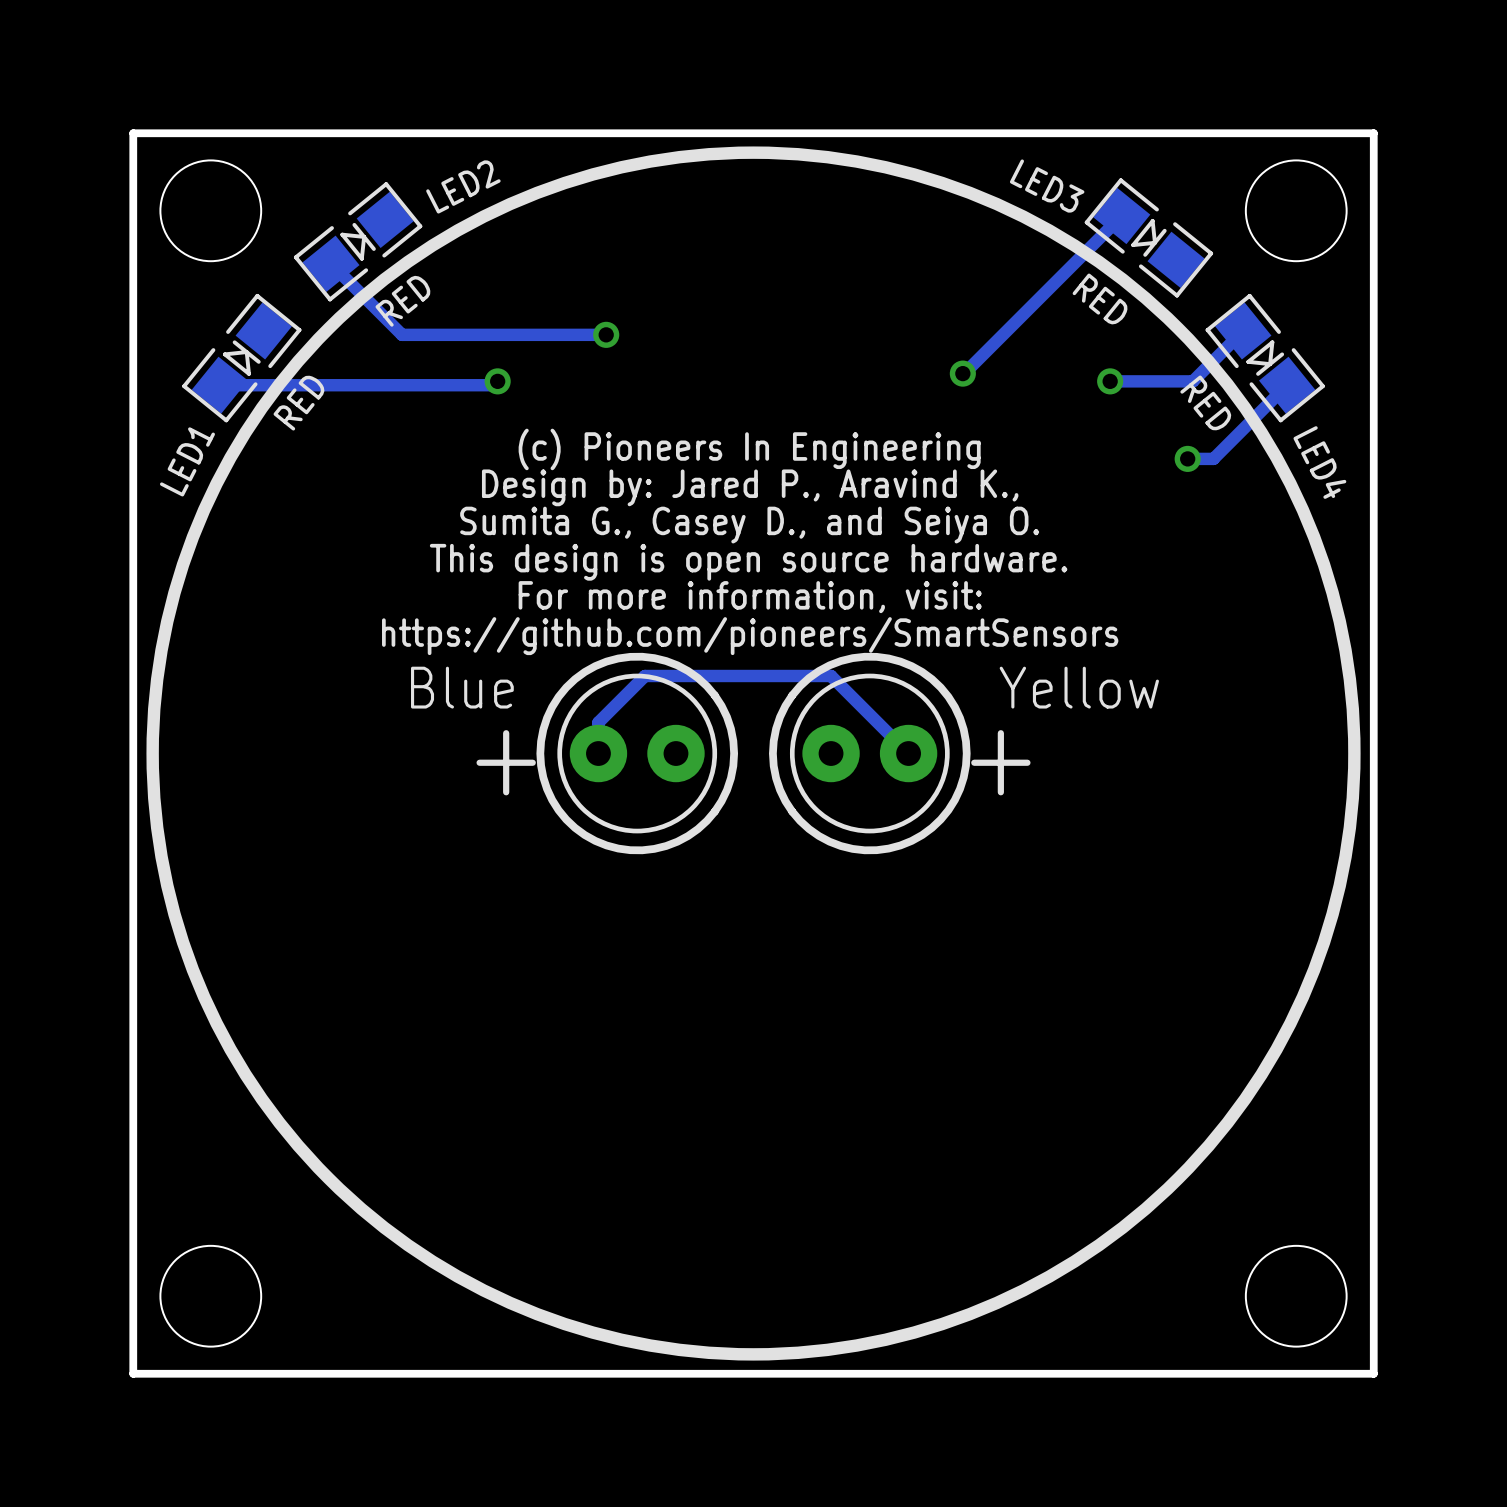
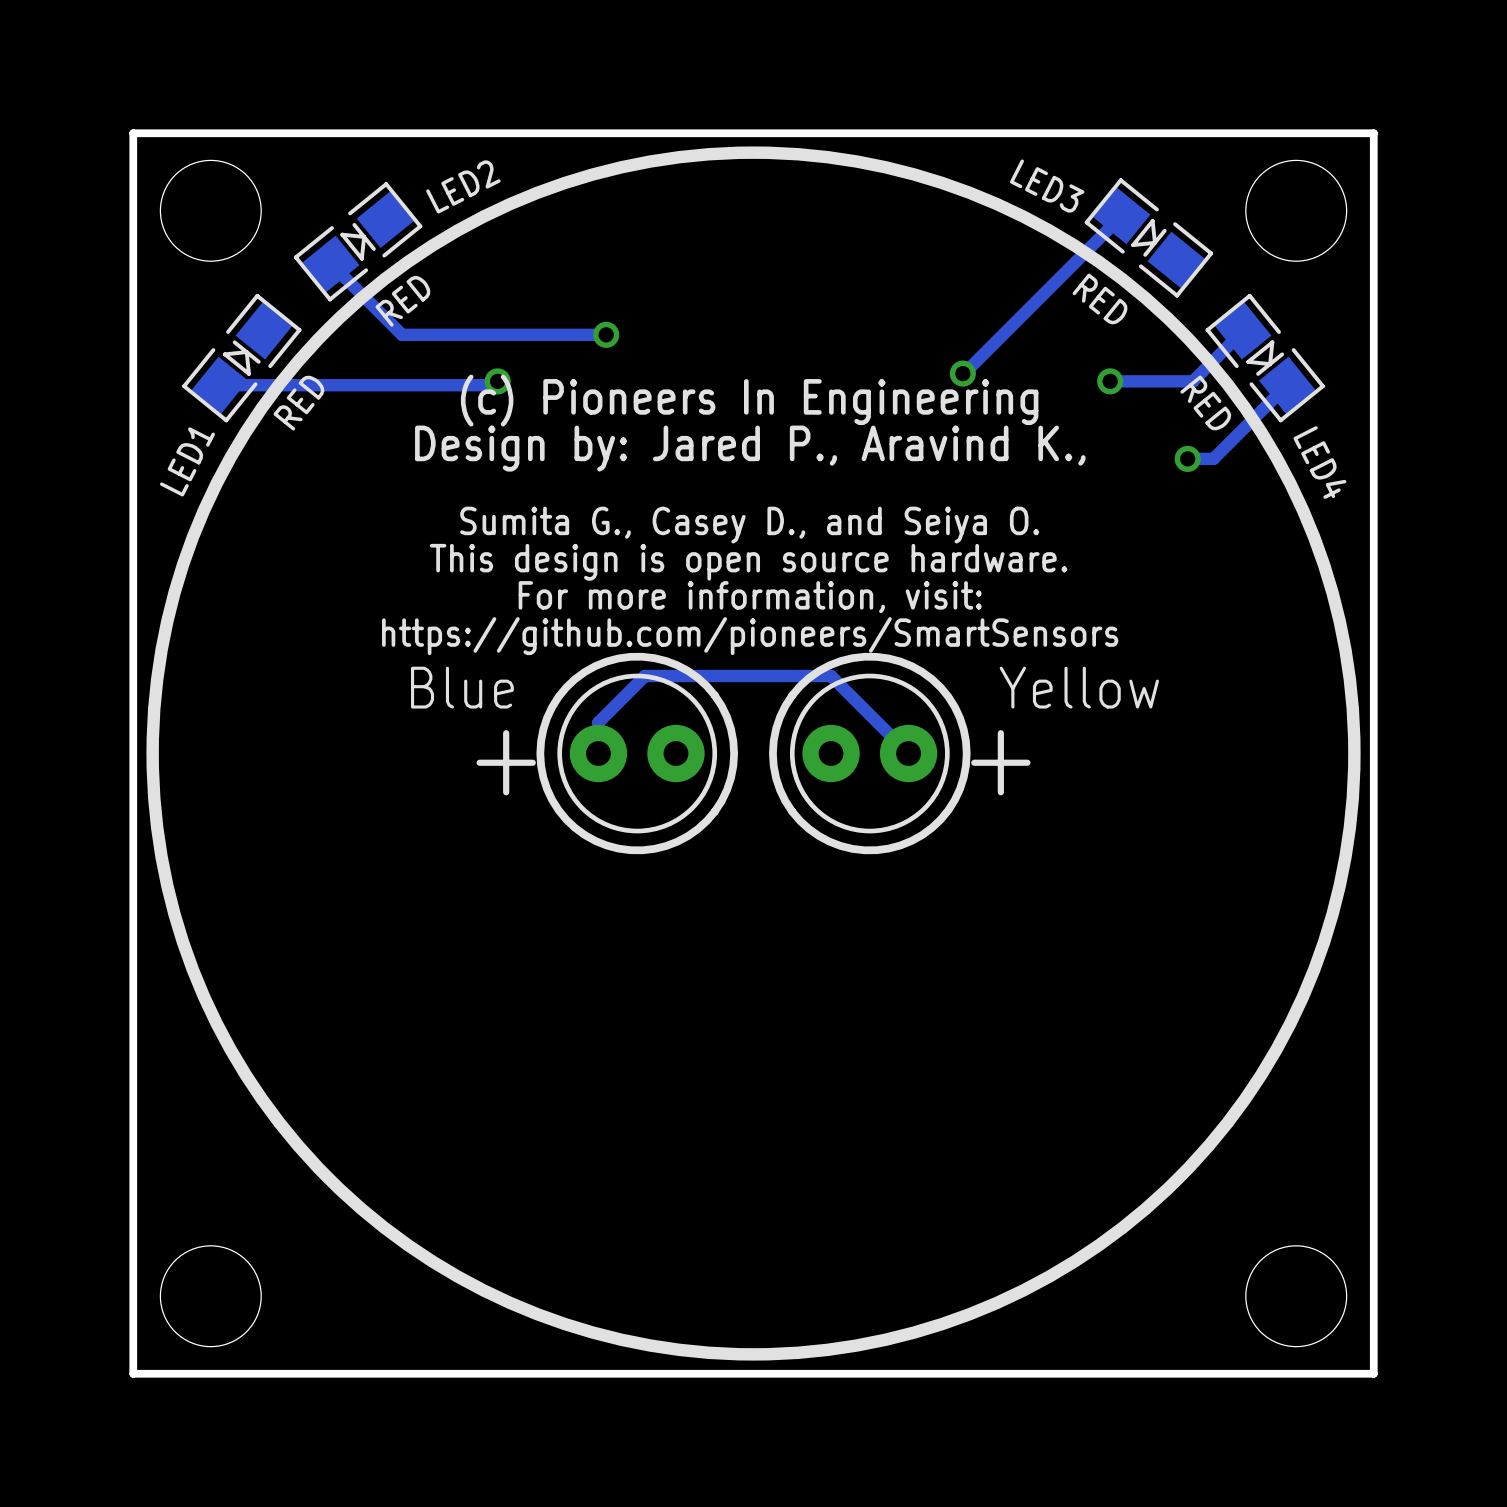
text: none -> (c) Pioneers In Engineering (749, 400)
text: (c) Pioneers In Engineering (749, 449) -> Design by: Jared P., Aravind K., (750, 448)
text: Design by: Jared P., Aravind K., (750, 487) -> none

